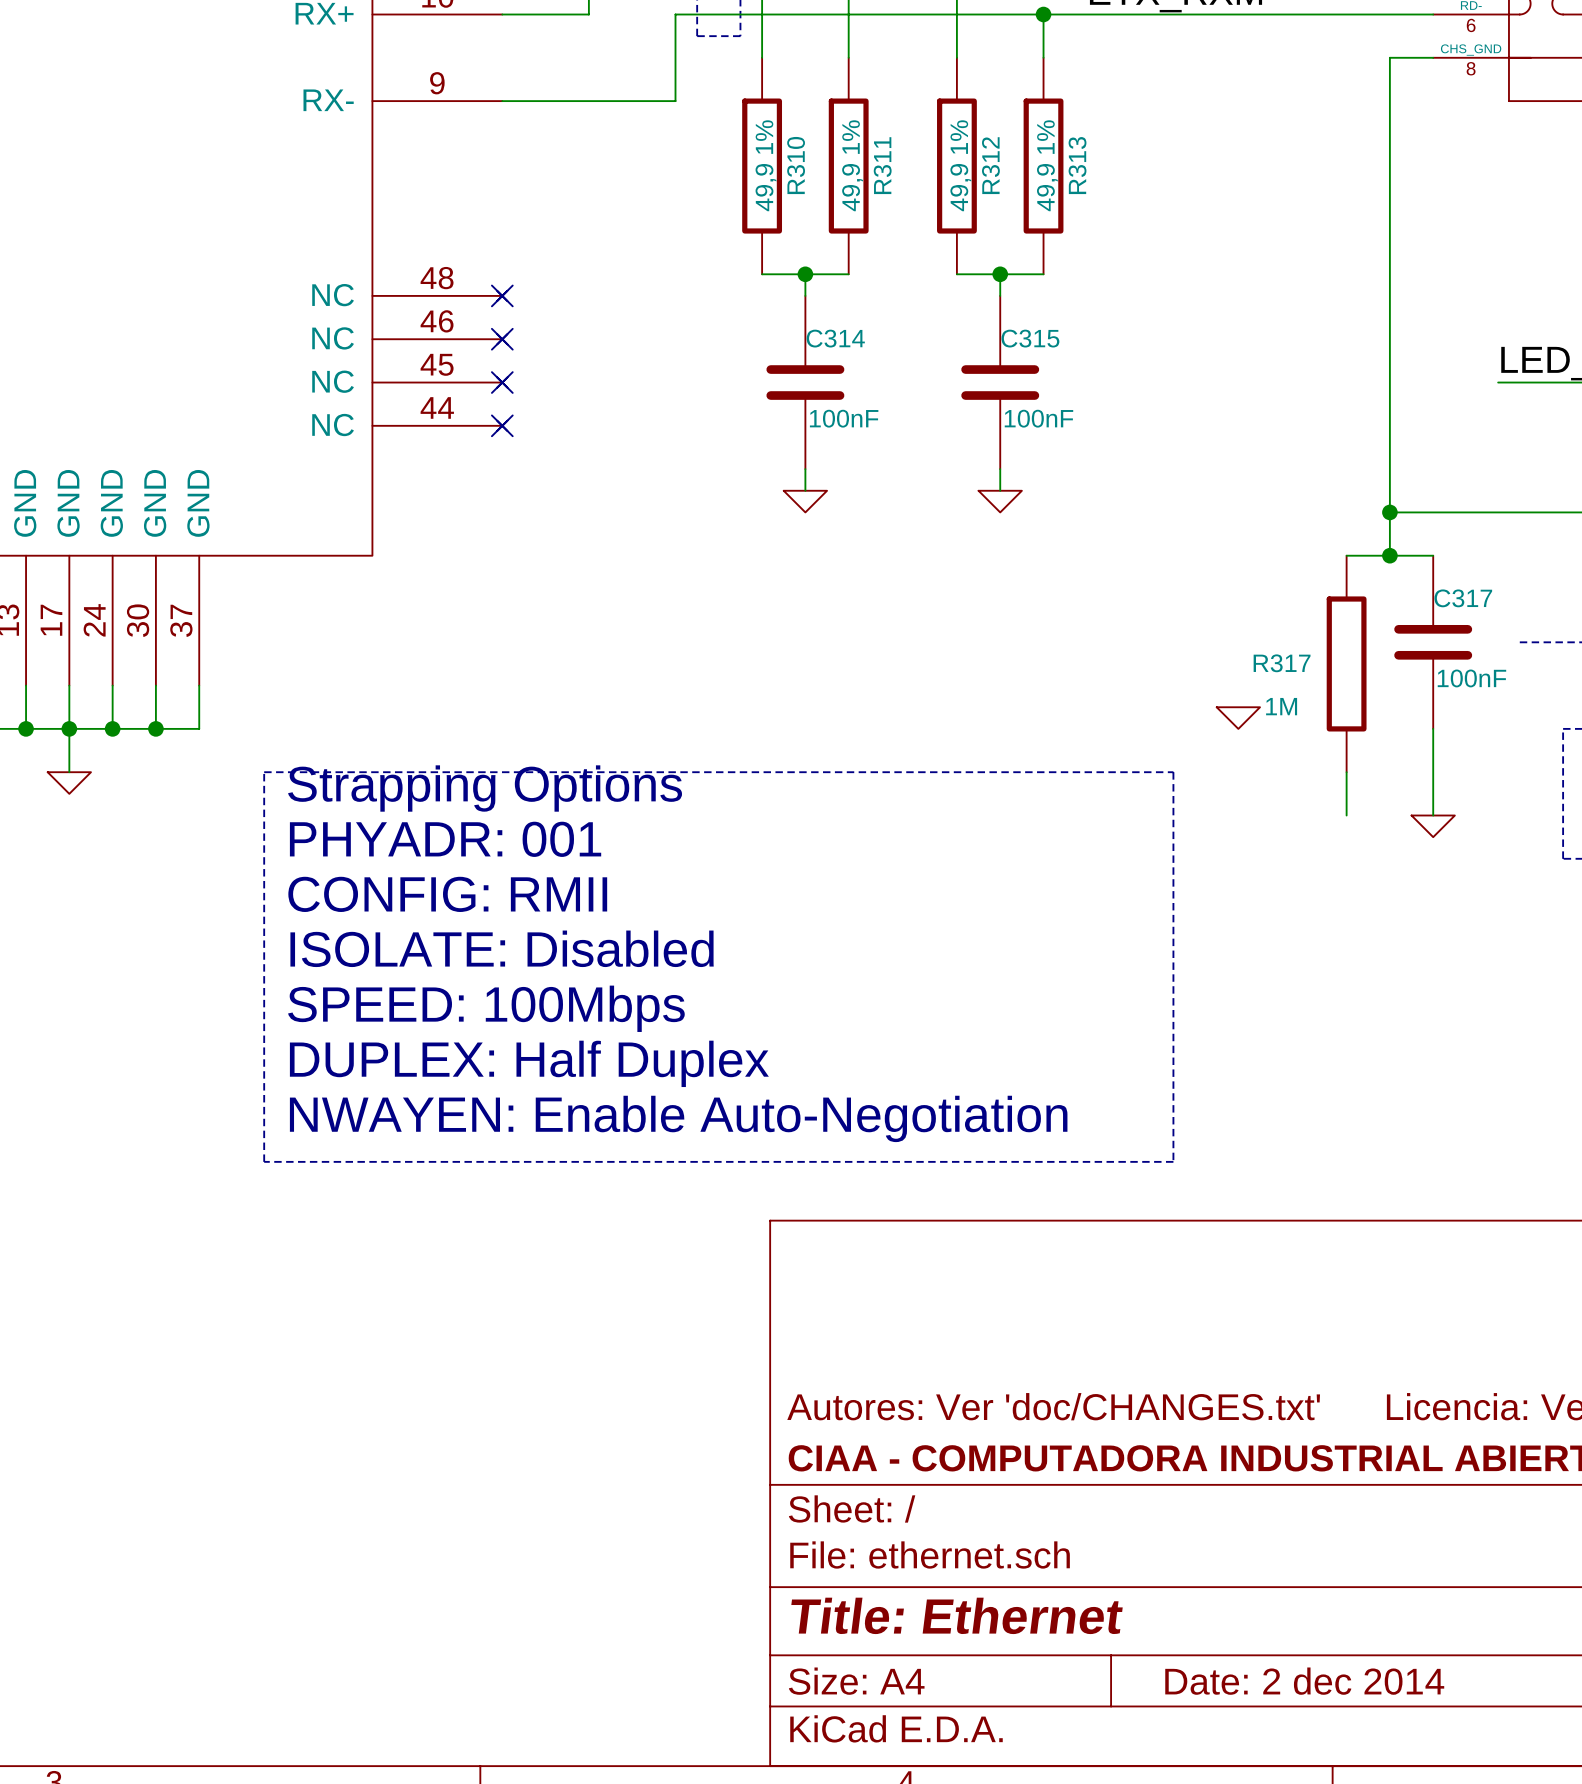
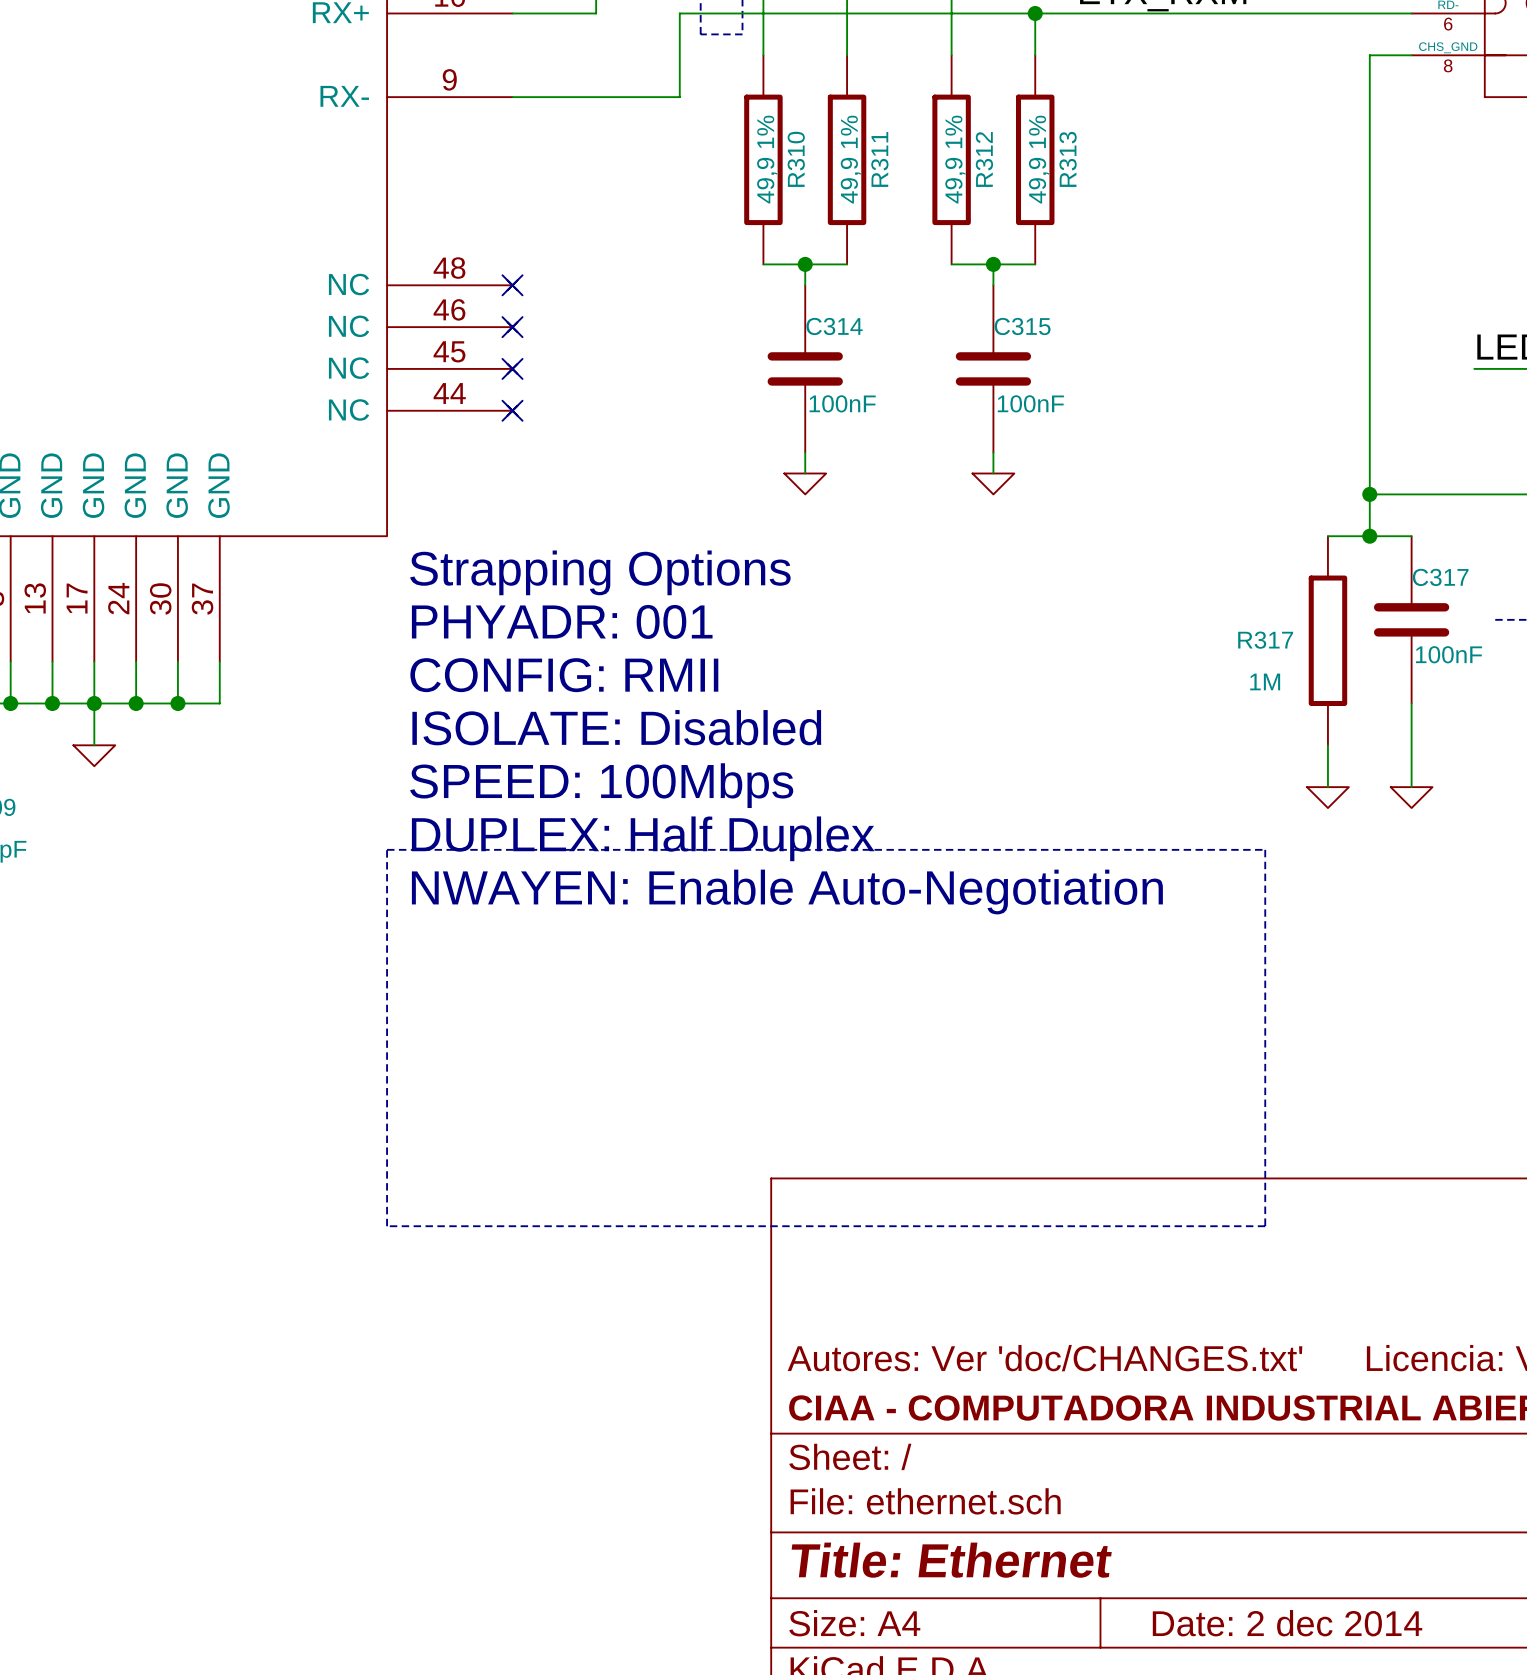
power symbol position: (1238, 718) -> (1327, 797)
line: (264, 772) (1173, 772) (1173, 1161) (264, 1161) (264, 772) -> (387, 849) (1265, 849) (1265, 1226) (387, 1226) (387, 849)
text position: Strapping Options (485, 788) -> Strapping Options (600, 572)
text position: PHYADR: 001 (445, 839) -> PHYADR: 001 (562, 621)
text position: CONFIG: RMII (447, 894) -> CONFIG: RMII (564, 675)
text position: ISOLATE: Disabled (502, 948) -> ISOLATE: Disabled (616, 727)
text position: SPEED: 100Mbps (486, 1008) -> SPEED: 100Mbps (601, 785)
text position: DUPLEX: Half Duplex (529, 1063) -> DUPLEX: Half Duplex (643, 838)
text position: NWAYEN: Enable Auto-Negotiation (678, 1118) -> NWAYEN: Enable Auto-Negotiation (787, 892)

